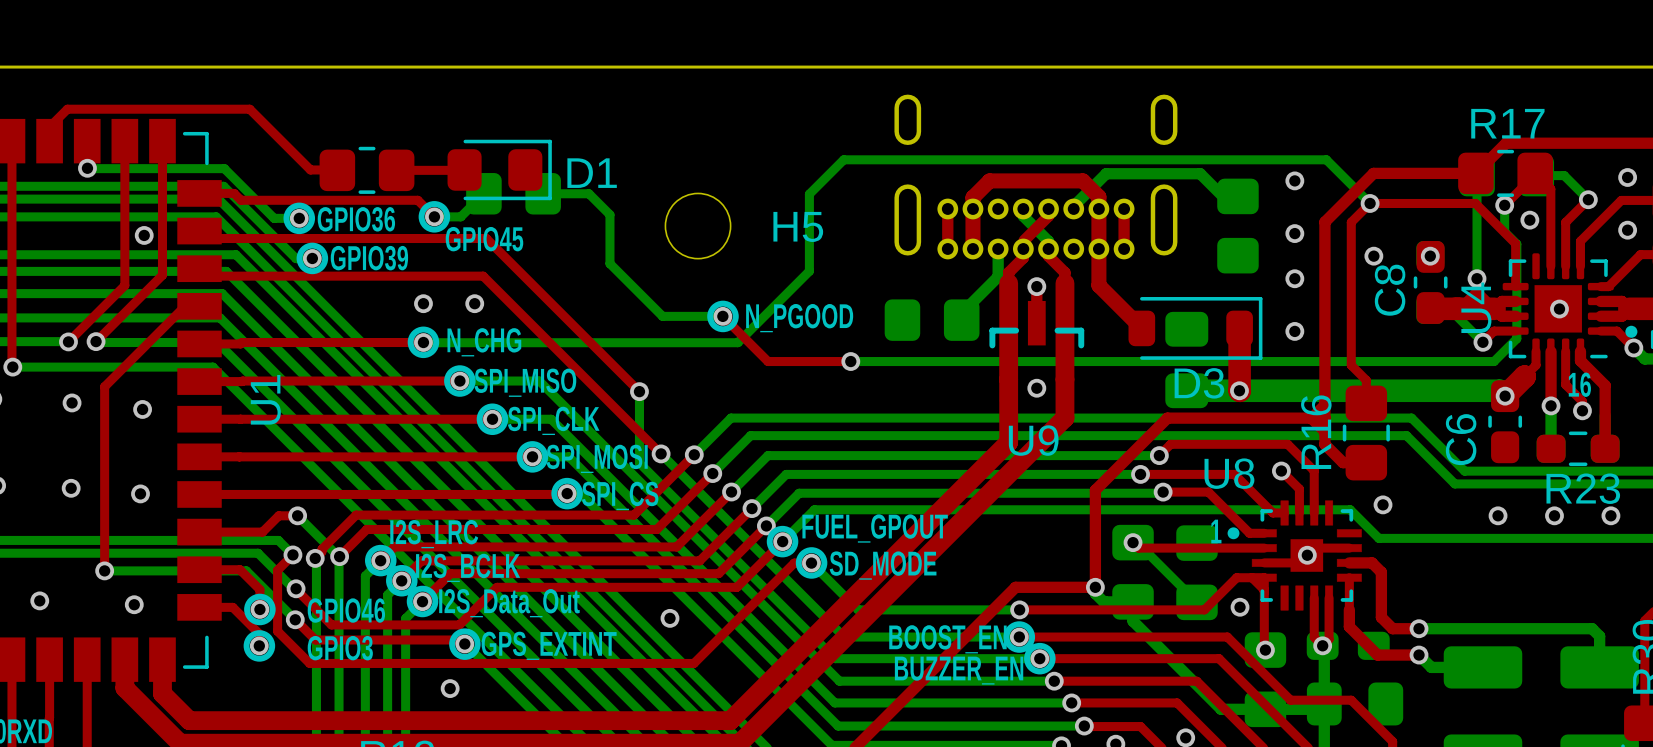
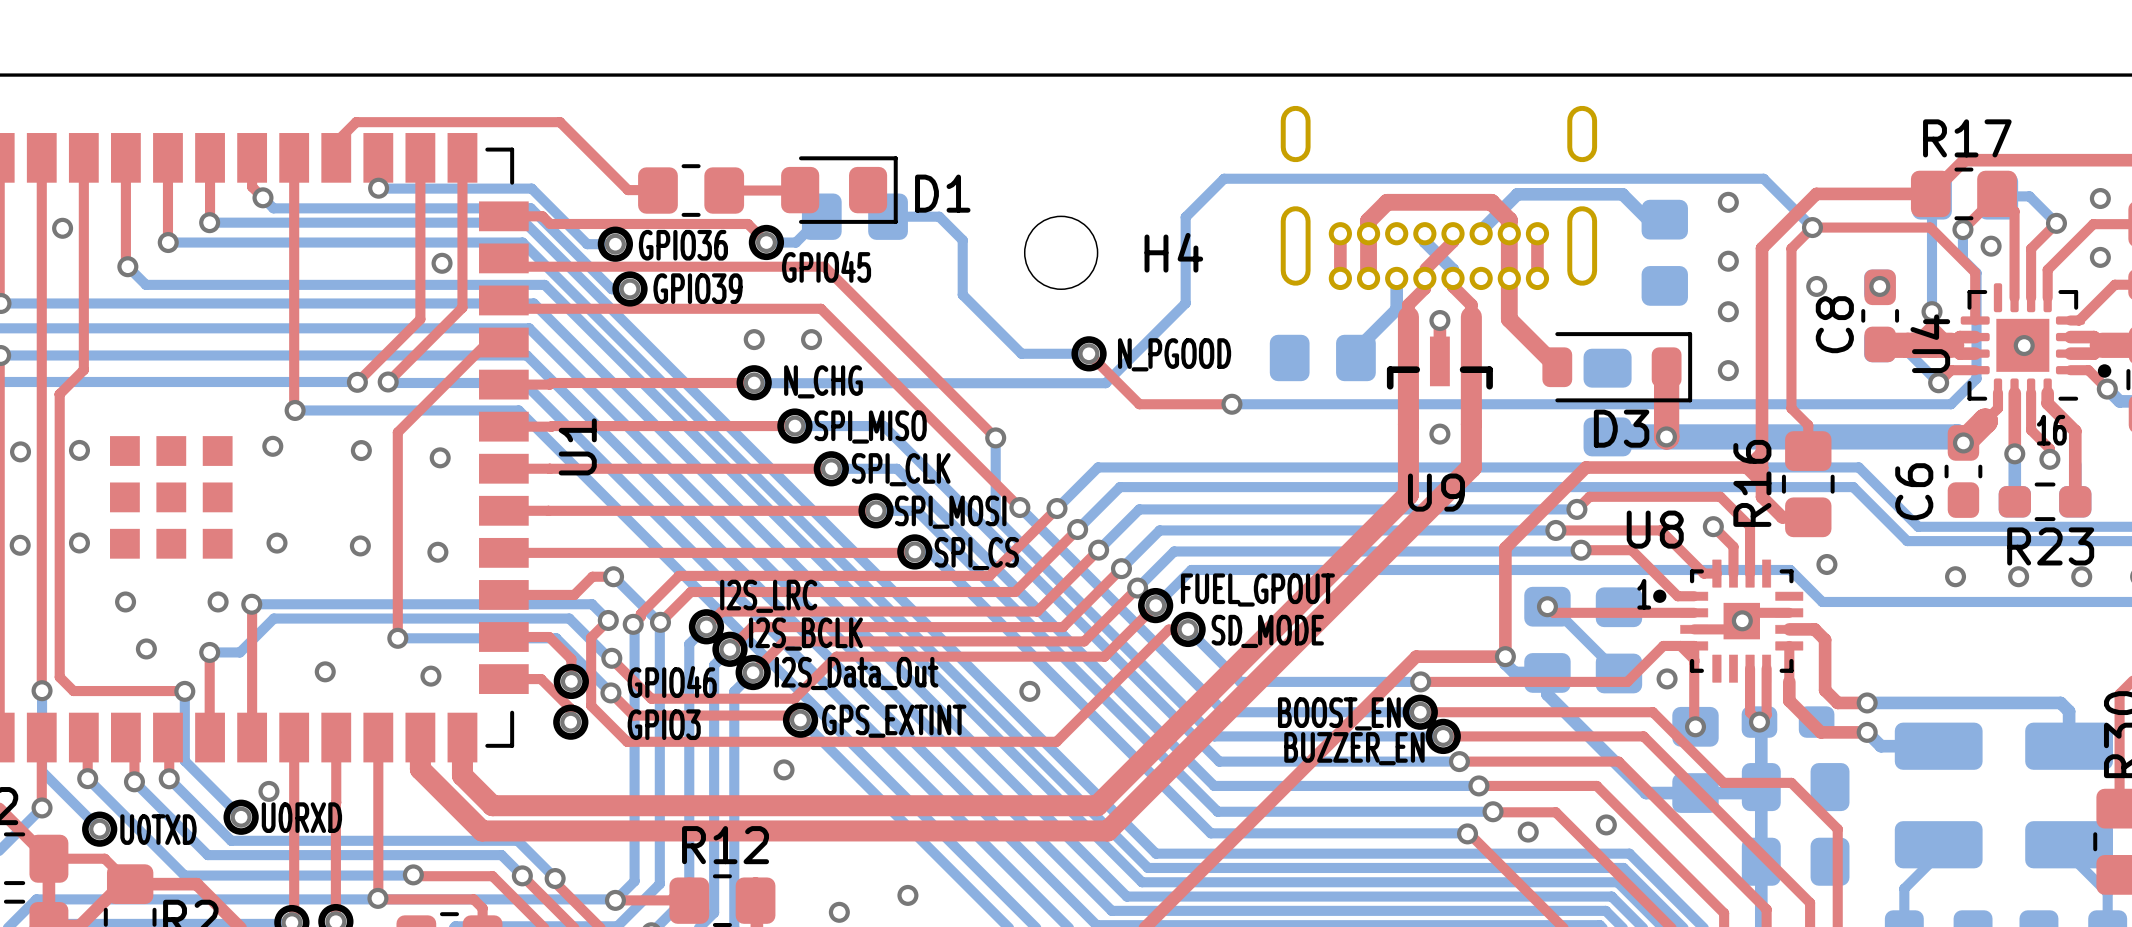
H5 name: H5 (798, 226) -> H4 (1173, 252)

